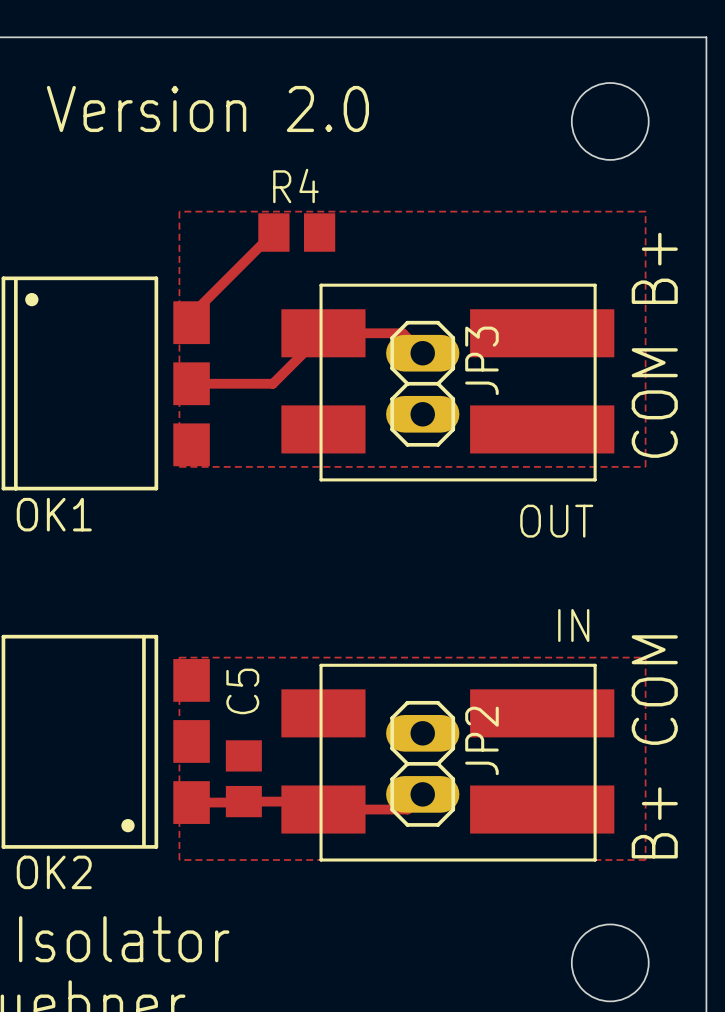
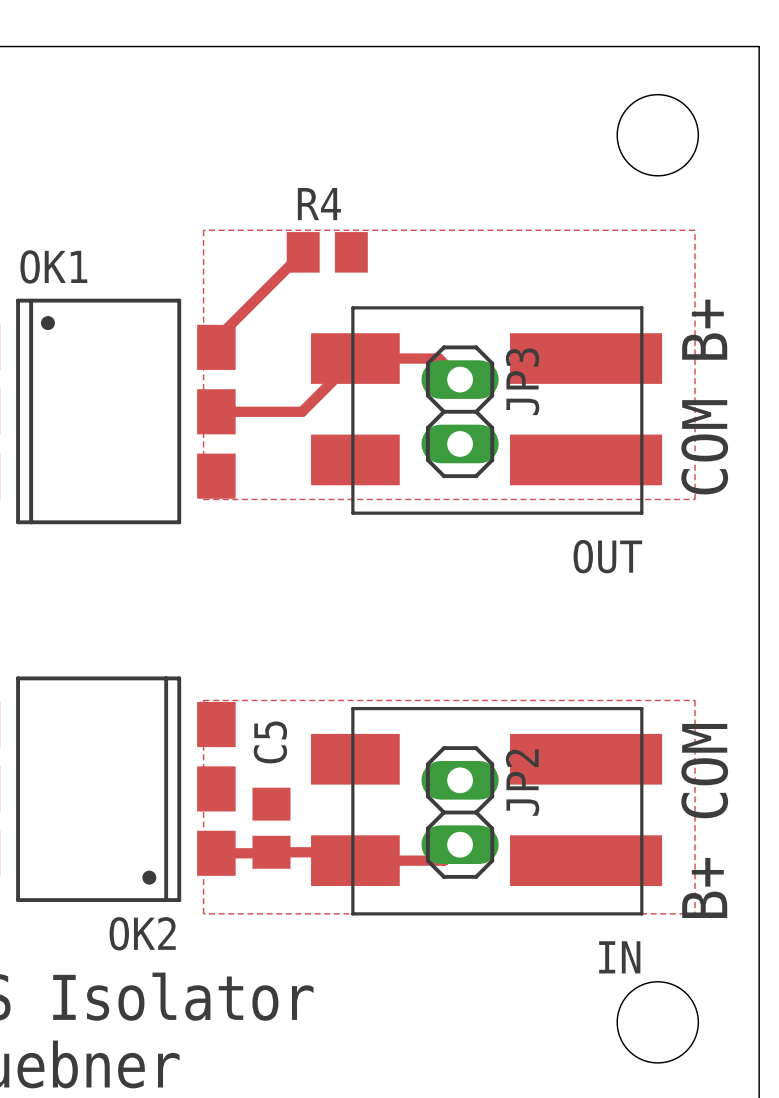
text: Version 2.0 (207, 108) -> none
OK1 name position: OK1 (54, 514) -> OK1 (53, 266)
IN name position: IN (573, 625) -> IN (619, 957)
OK2 name position: OK2 (54, 872) -> OK2 (142, 933)

